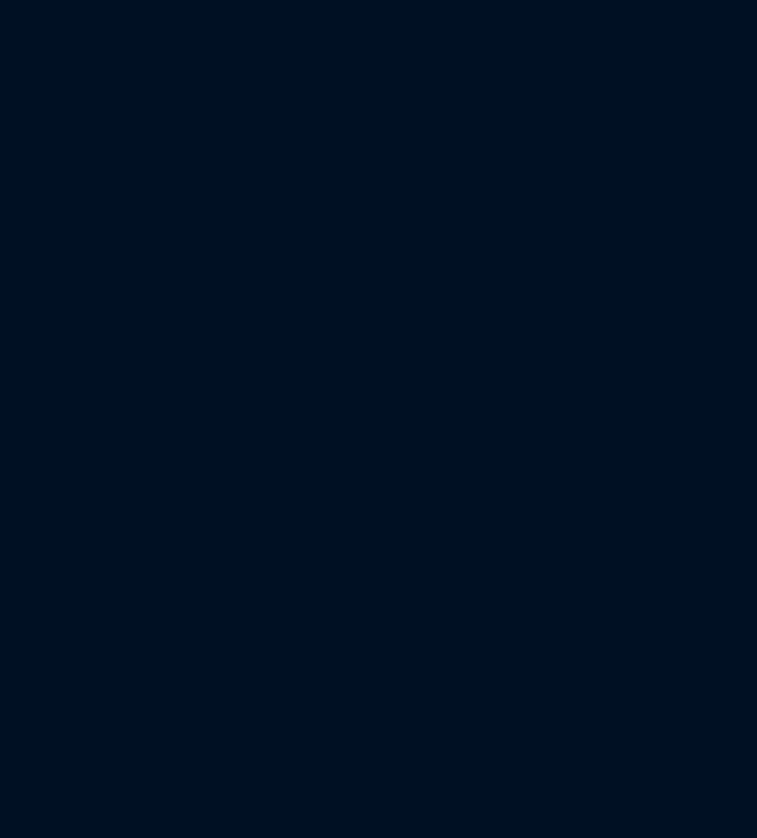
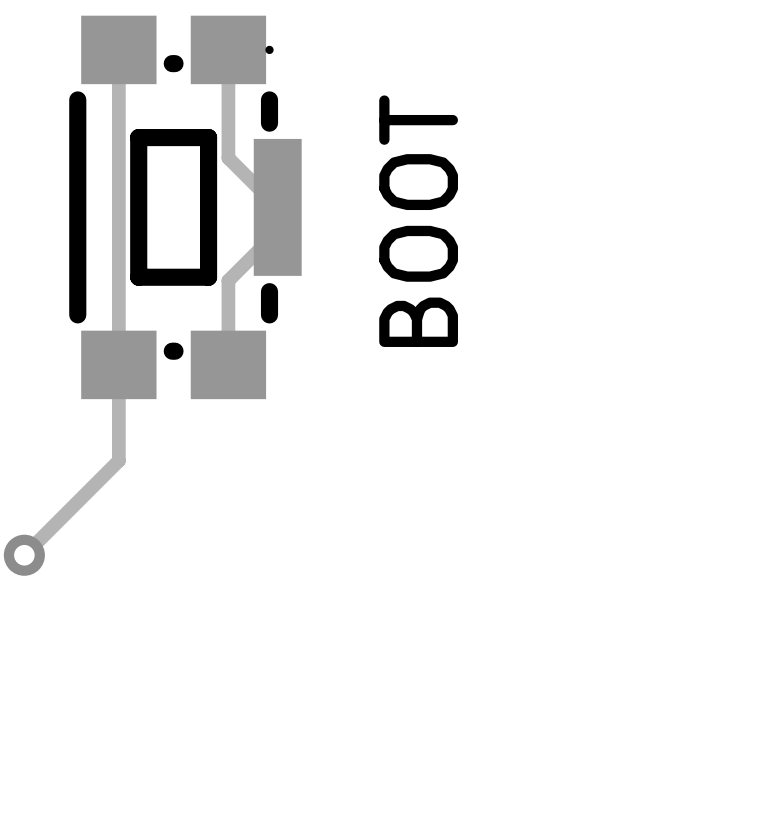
track: none -> (118, 49) (118, 460) (24, 555)
track: none -> (228, 49) (228, 158) (277, 207) (277, 231) (228, 280) (228, 364)
part: none -> (185, 207)
text: none -> BOOT (418, 221)
via: none -> (24, 555)

